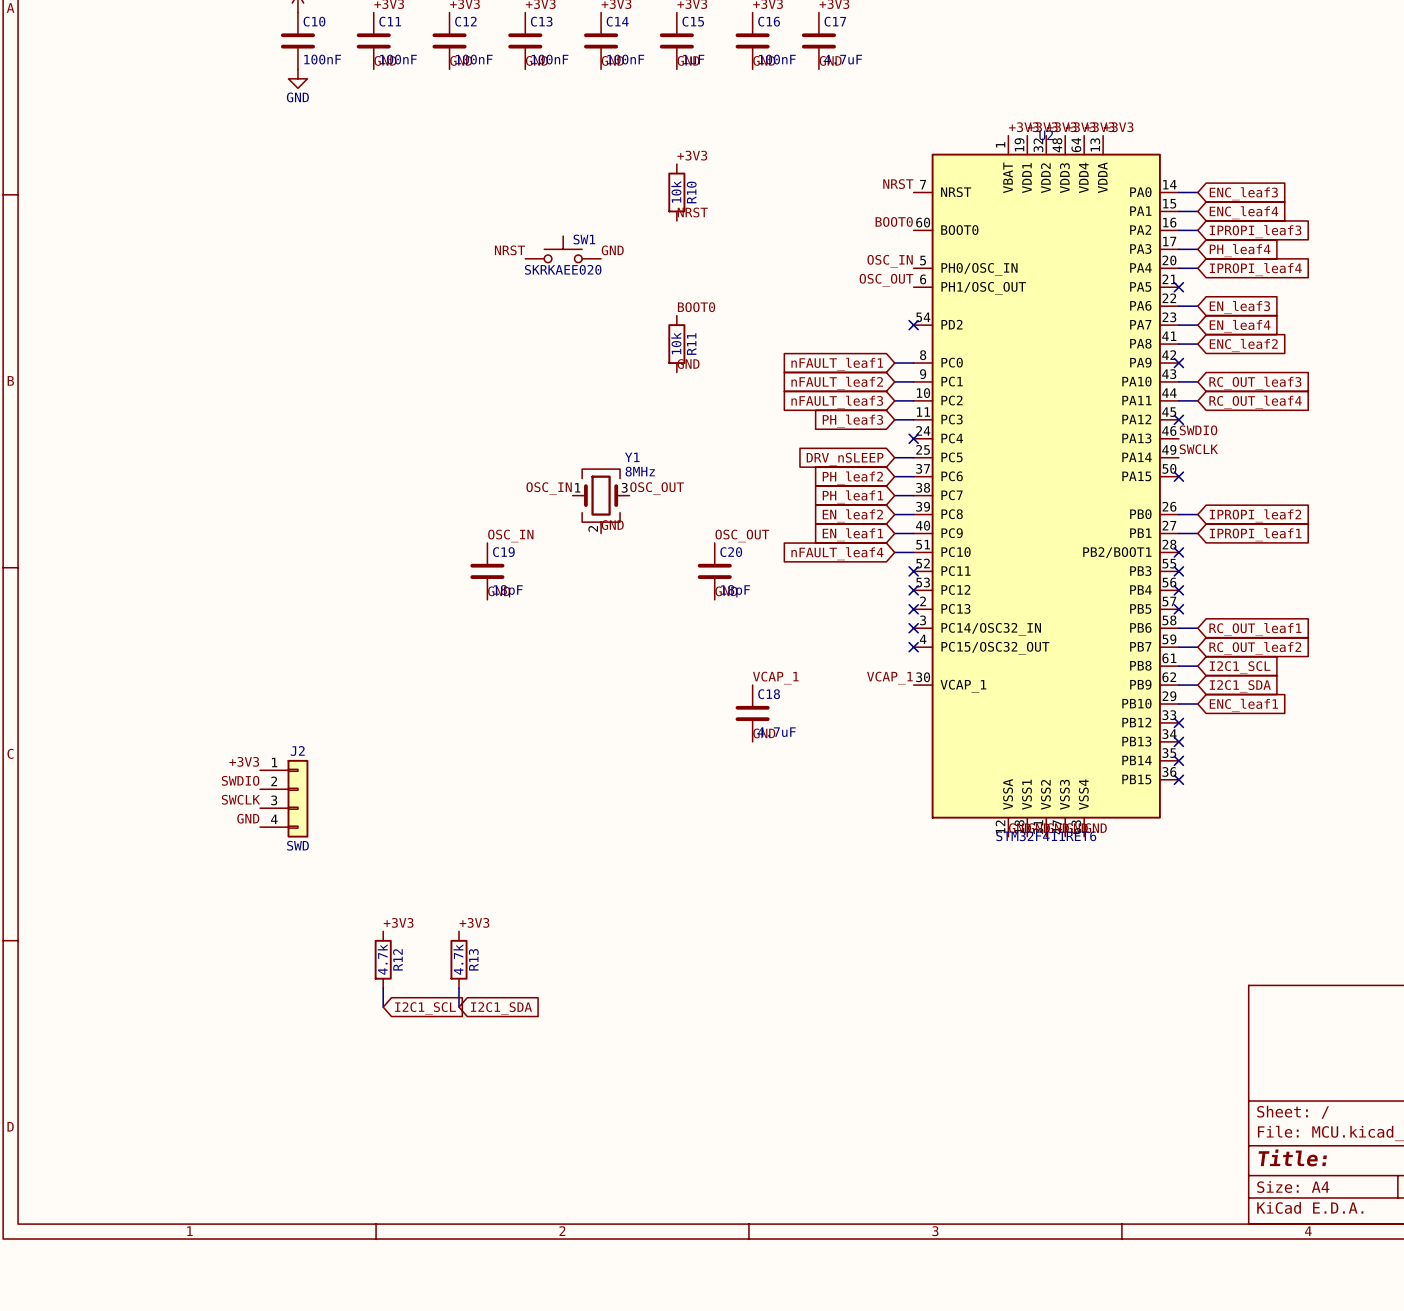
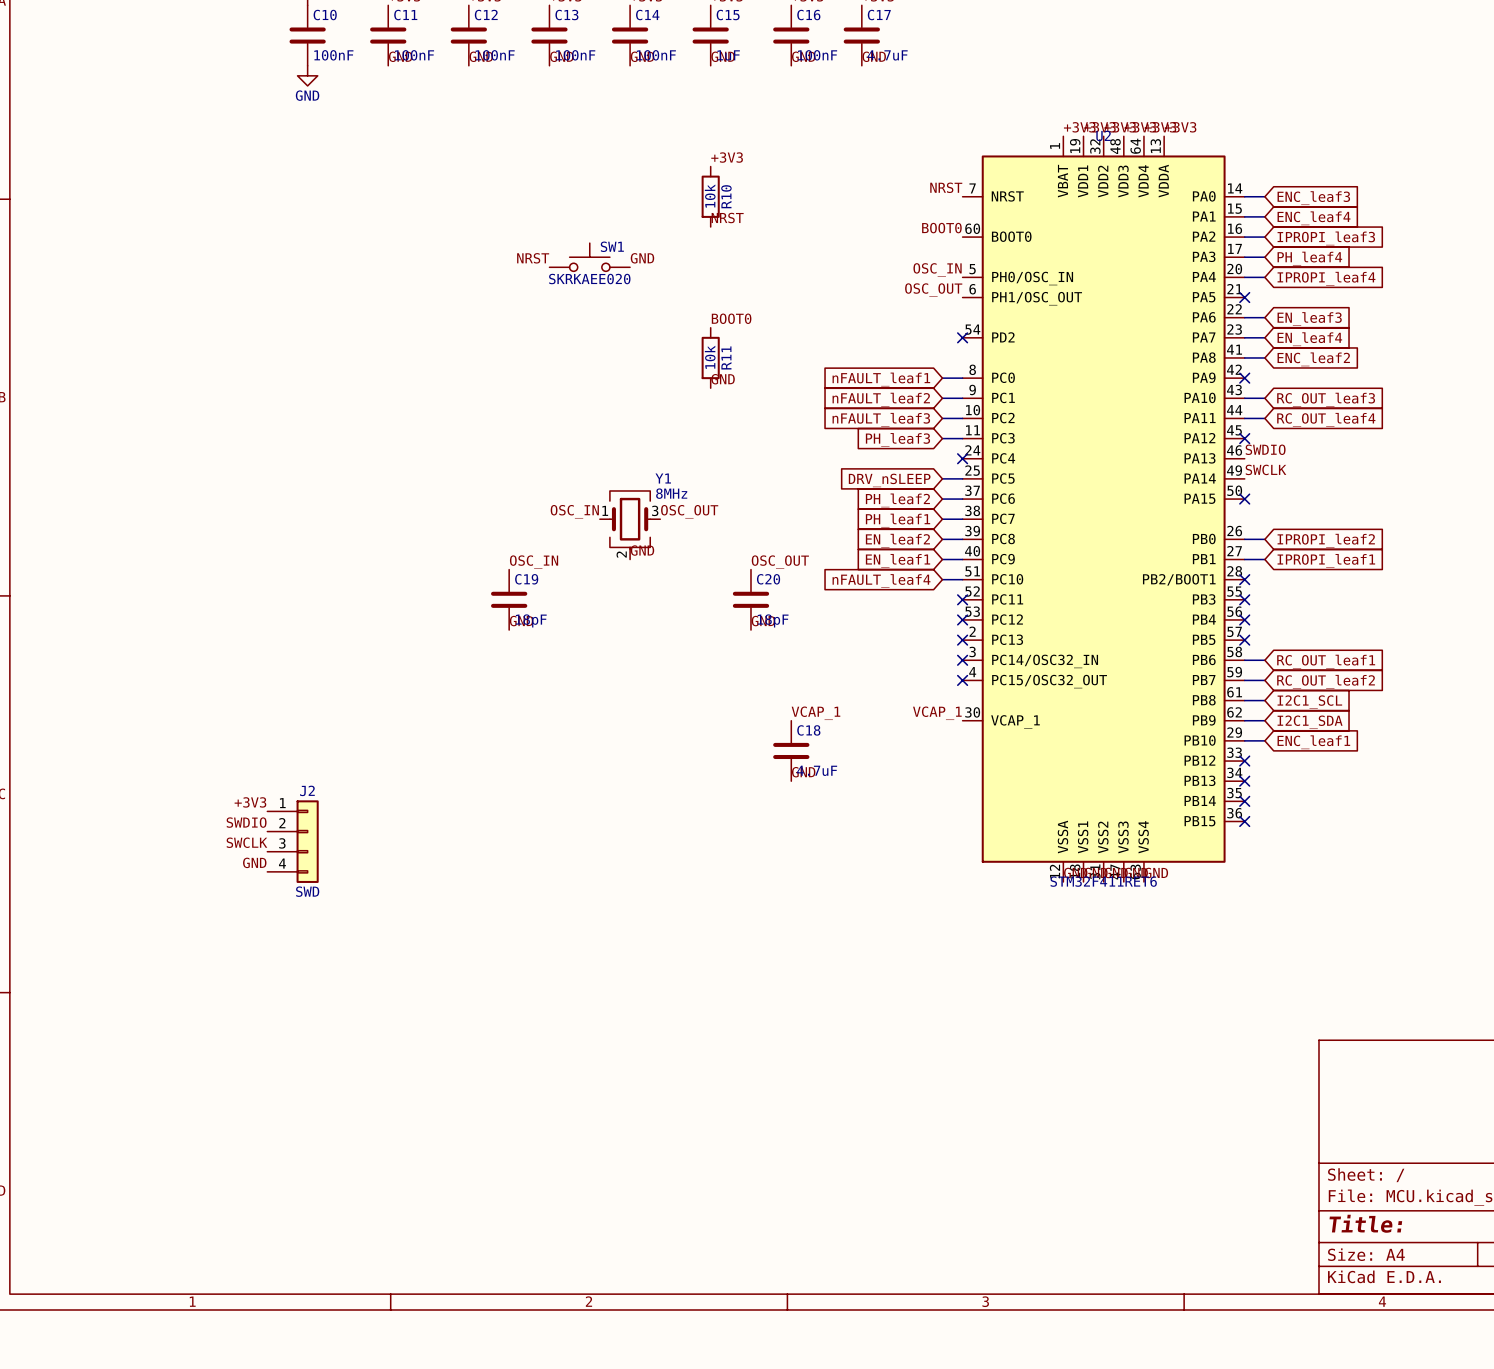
label: +3V3 (398, 922) -> none
label: +3V3 (474, 922) -> none
R12: 4.7k (383, 959) -> none
R13: 4.7k (458, 959) -> none
wire: (383, 988) (383, 1007) -> none
wire: (458, 988) (458, 1007) -> none
global label: I2C1_SCL (425, 1008) -> none
global label: I2C1_SDA (501, 1008) -> none

